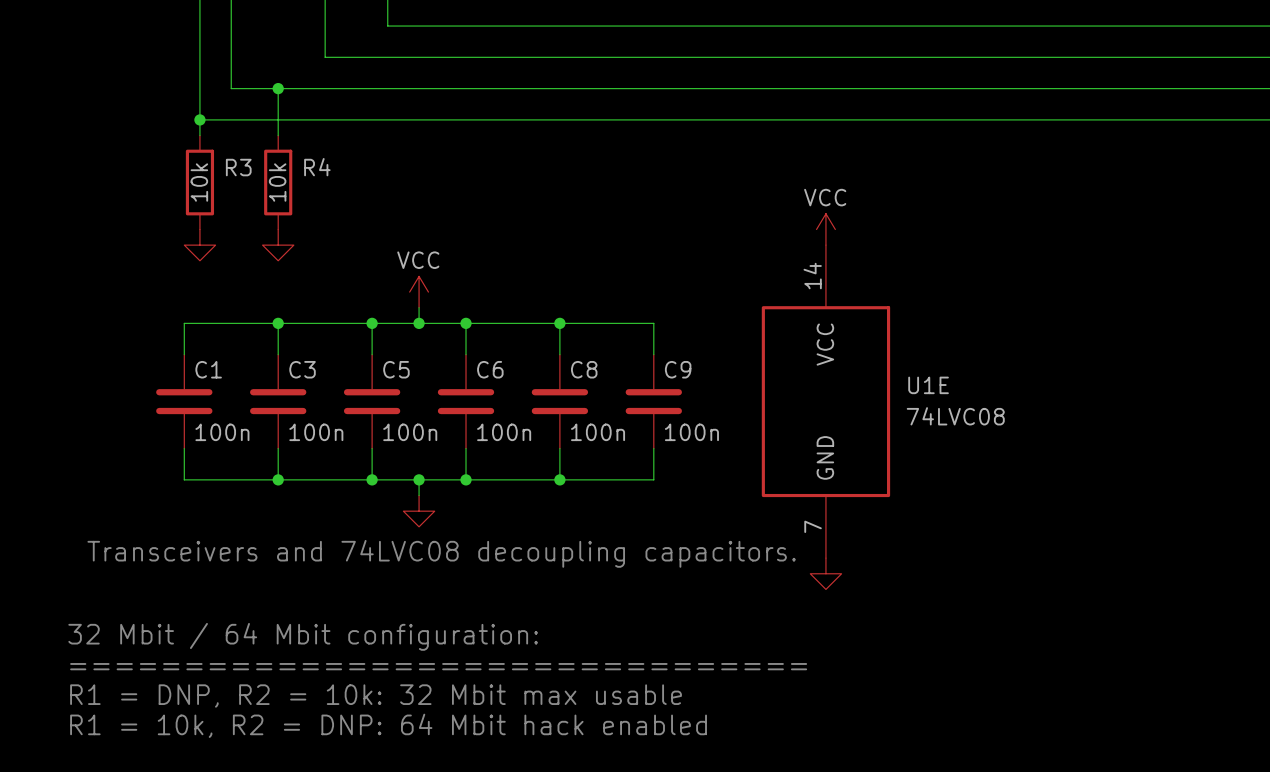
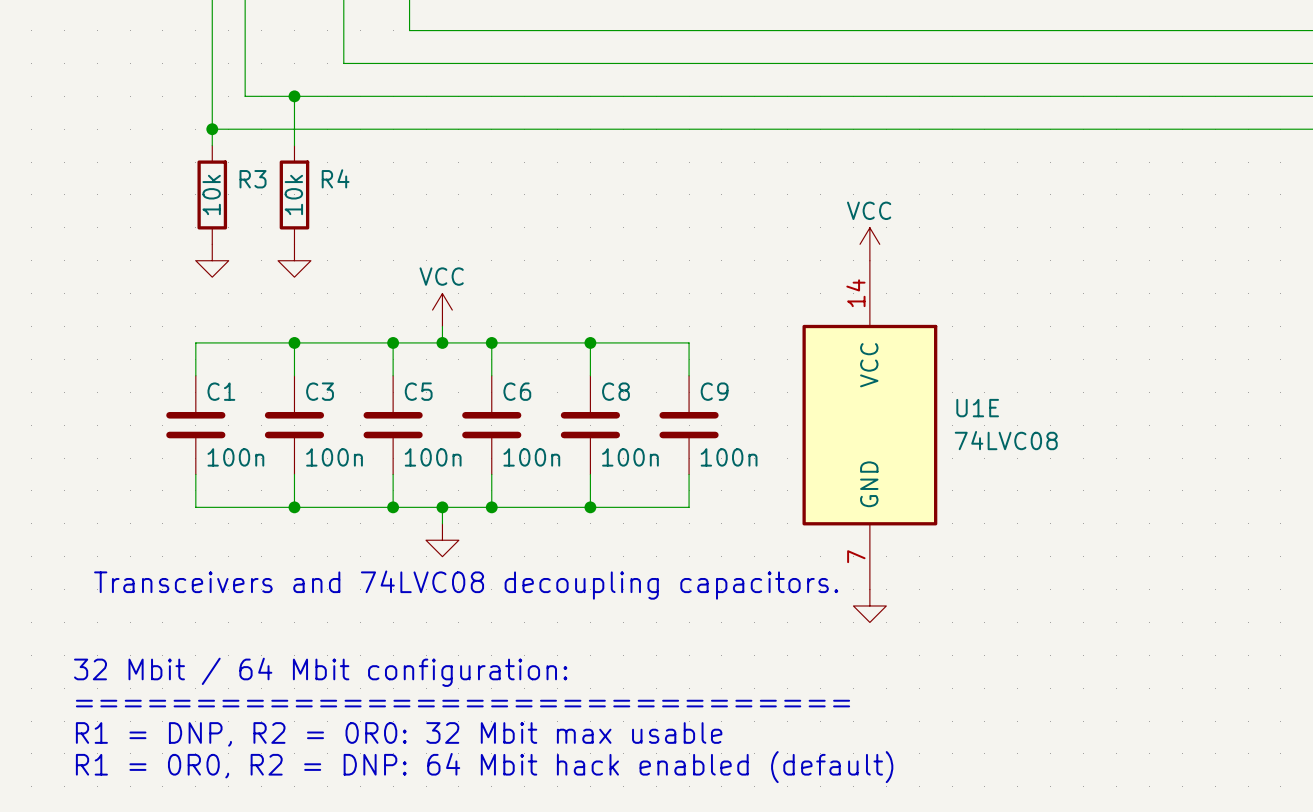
text: R1 = DNP, R2 = 10k: 32 Mbit max usable (376, 696) -> R1 = DNP, R2 = 0R0: 32 Mbit max usable (399, 734)
text: R1 = 10k, R2 = DNP: 64 Mbit hack enabled (388, 725) -> R1 = 0R0, R2 = DNP: 64 Mbit hack enabled (default) (484, 767)

